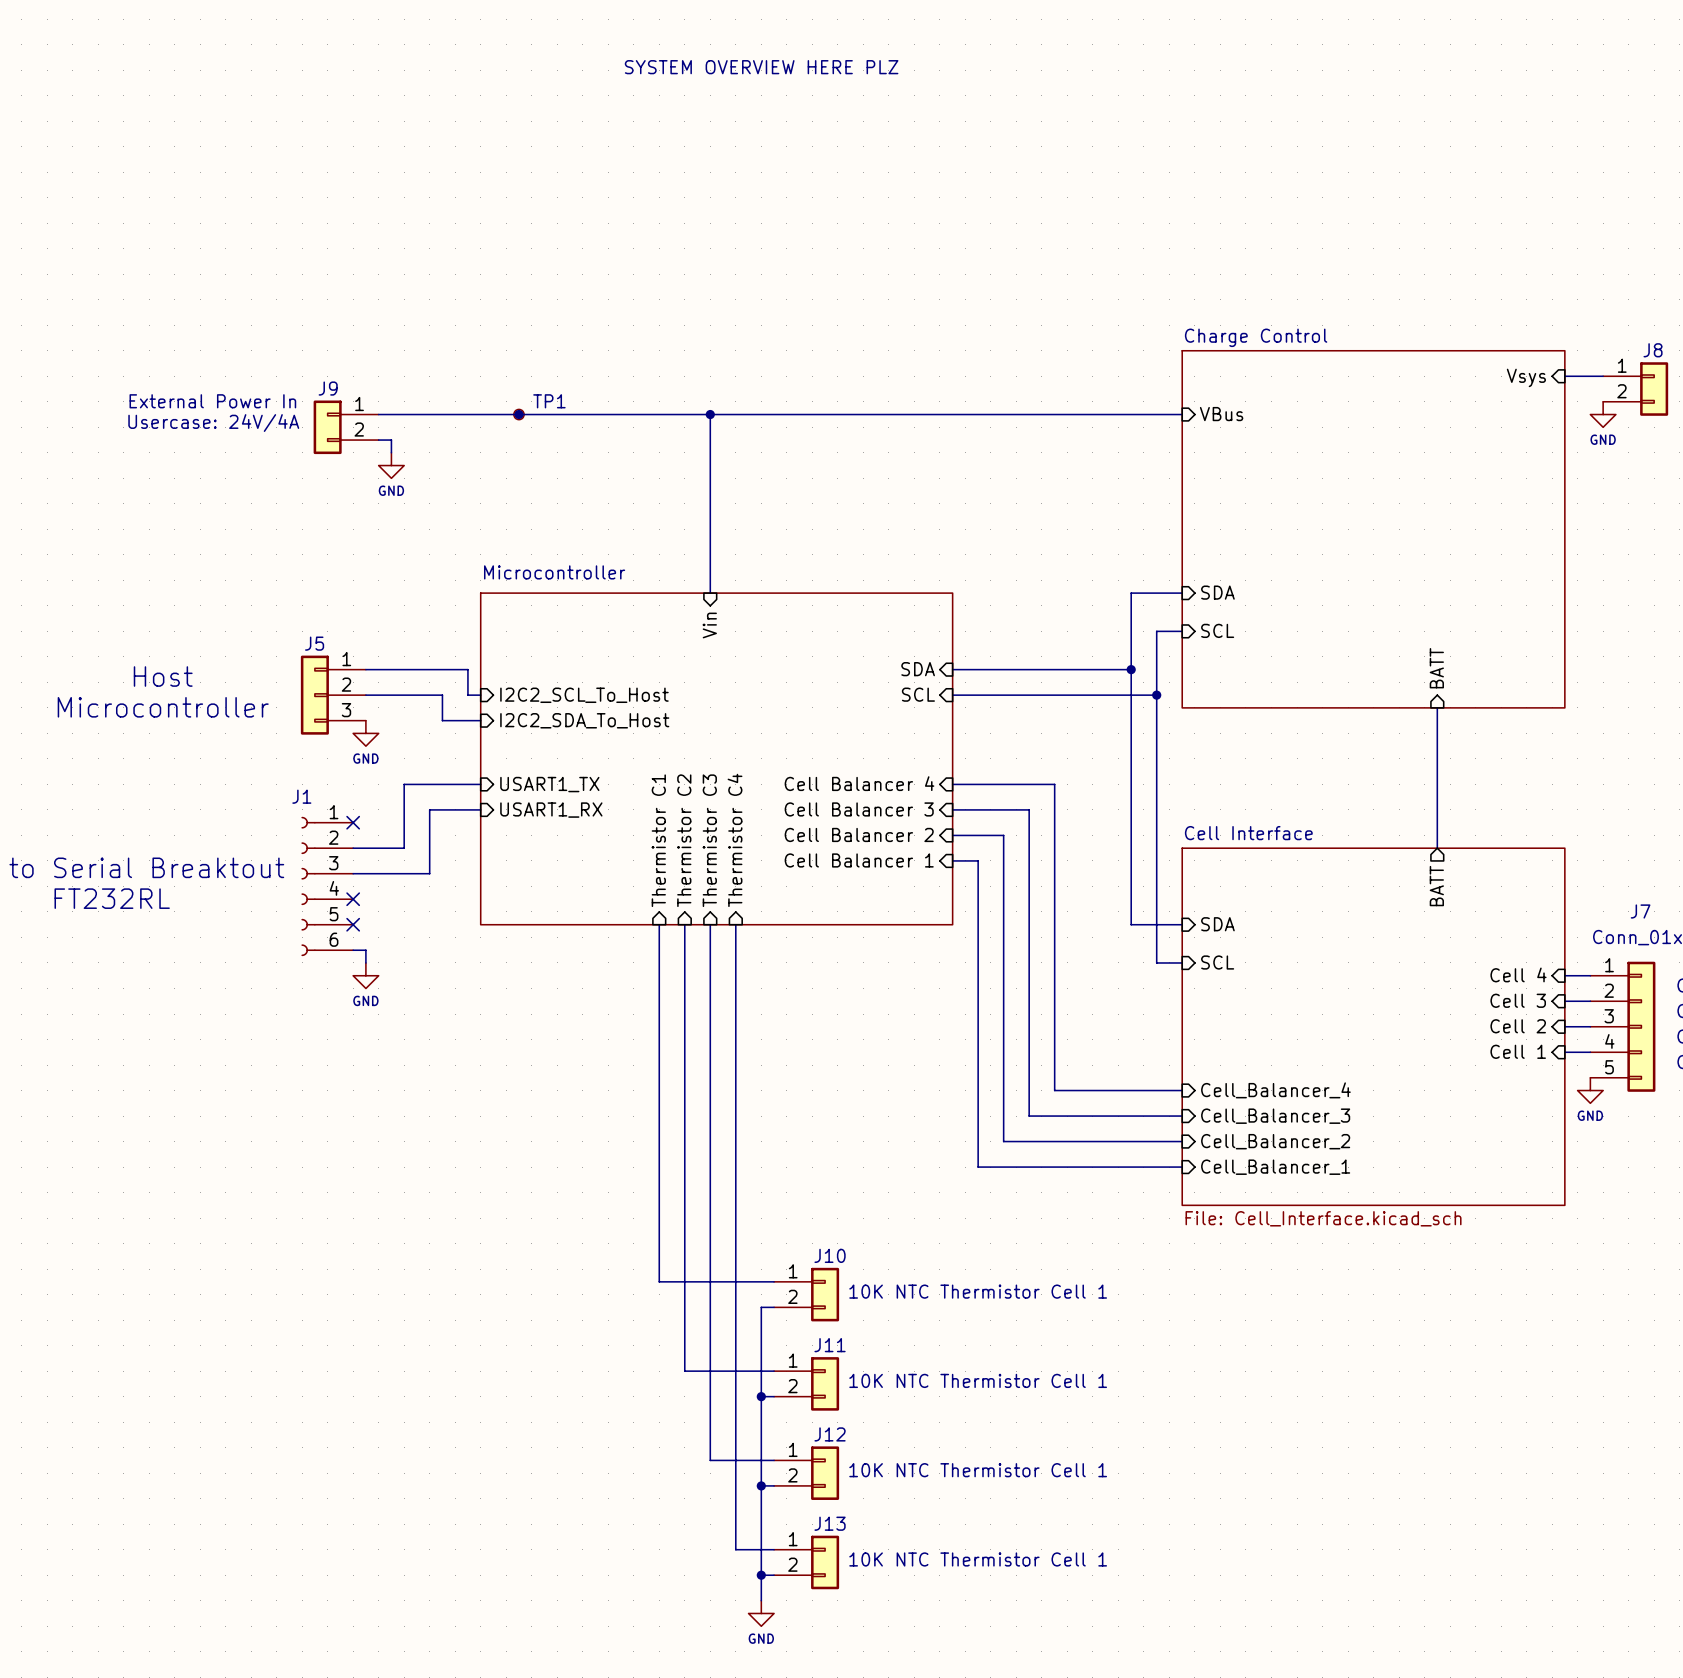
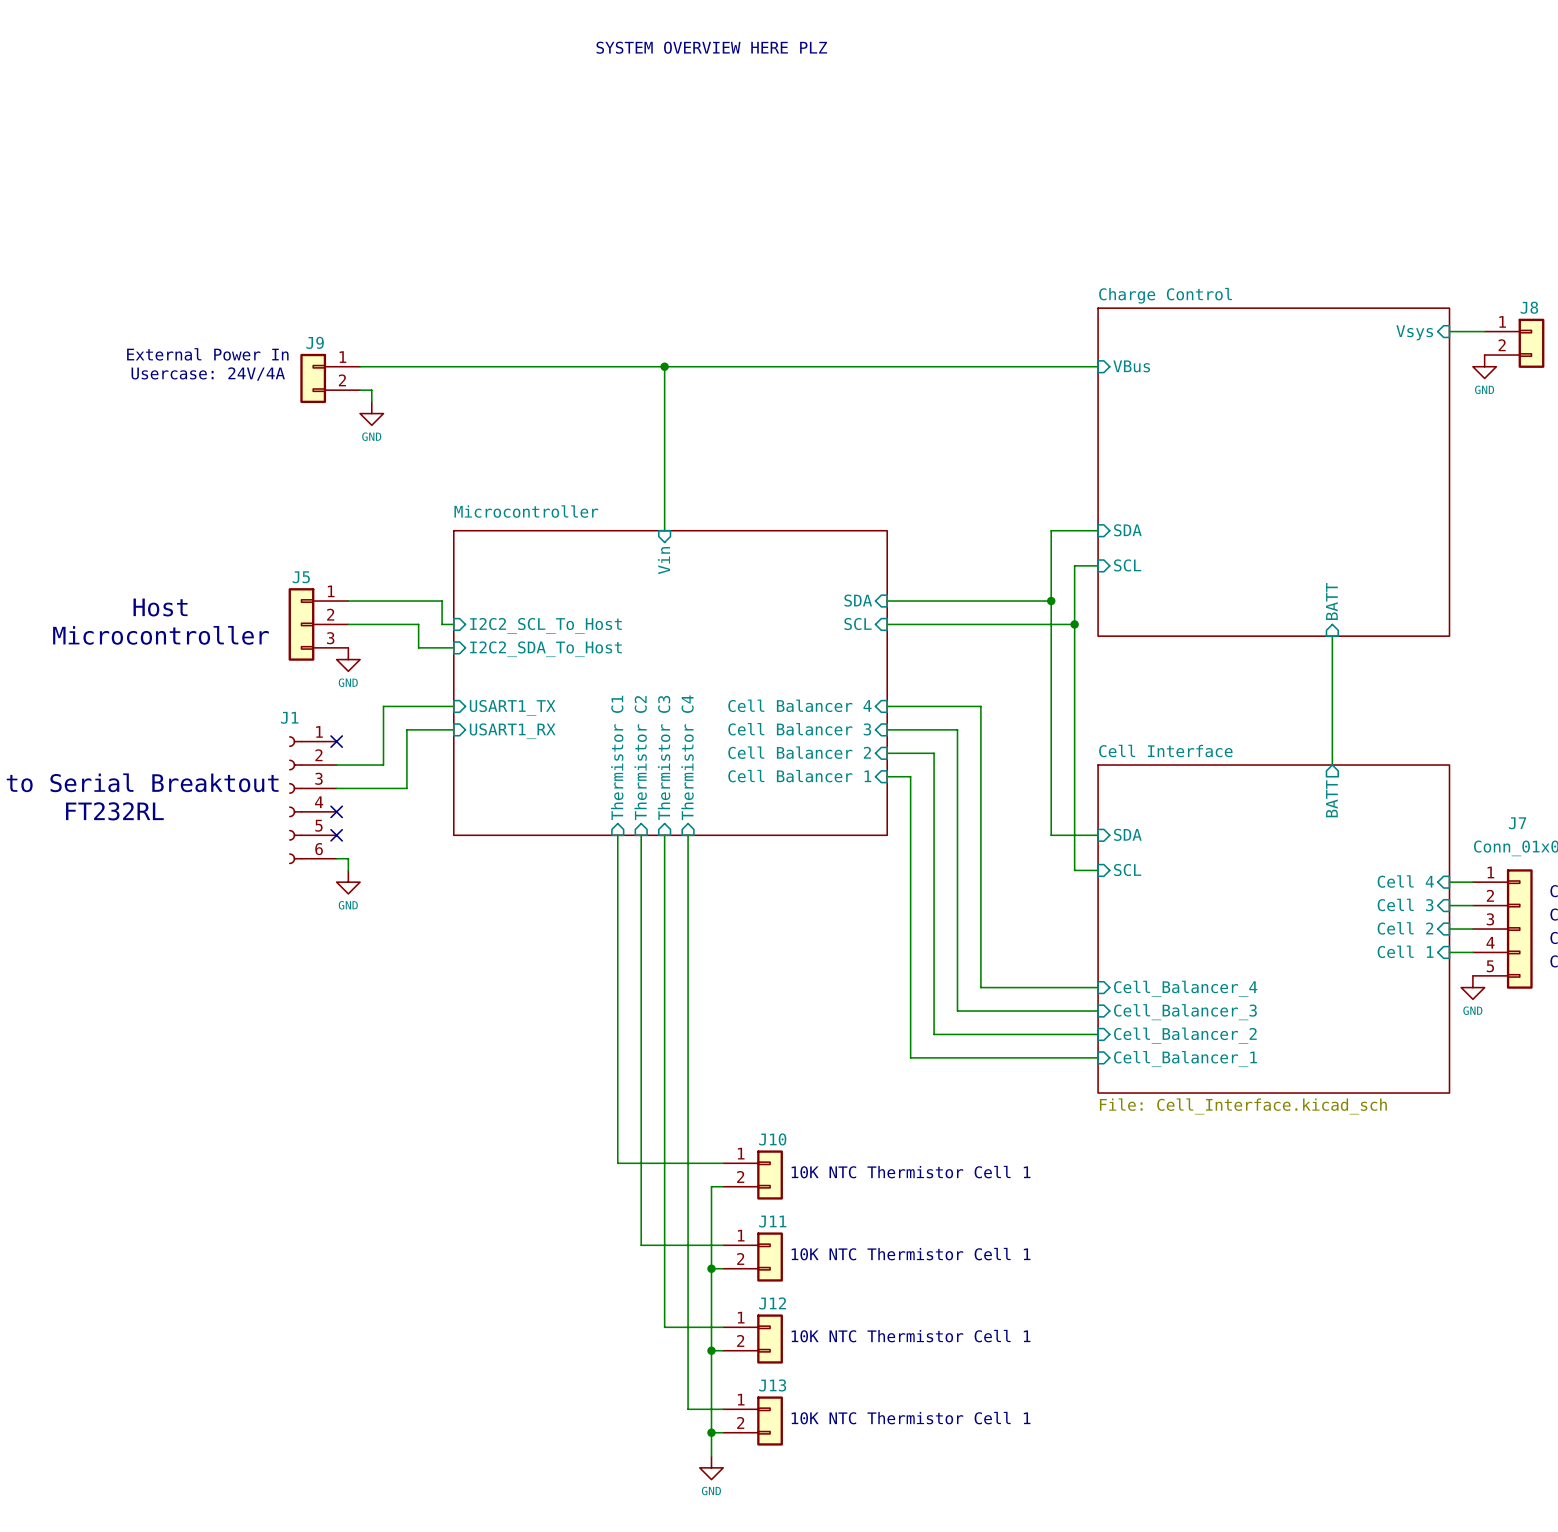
junction: (518, 414) -> none
TP1: (518, 414) -> none

